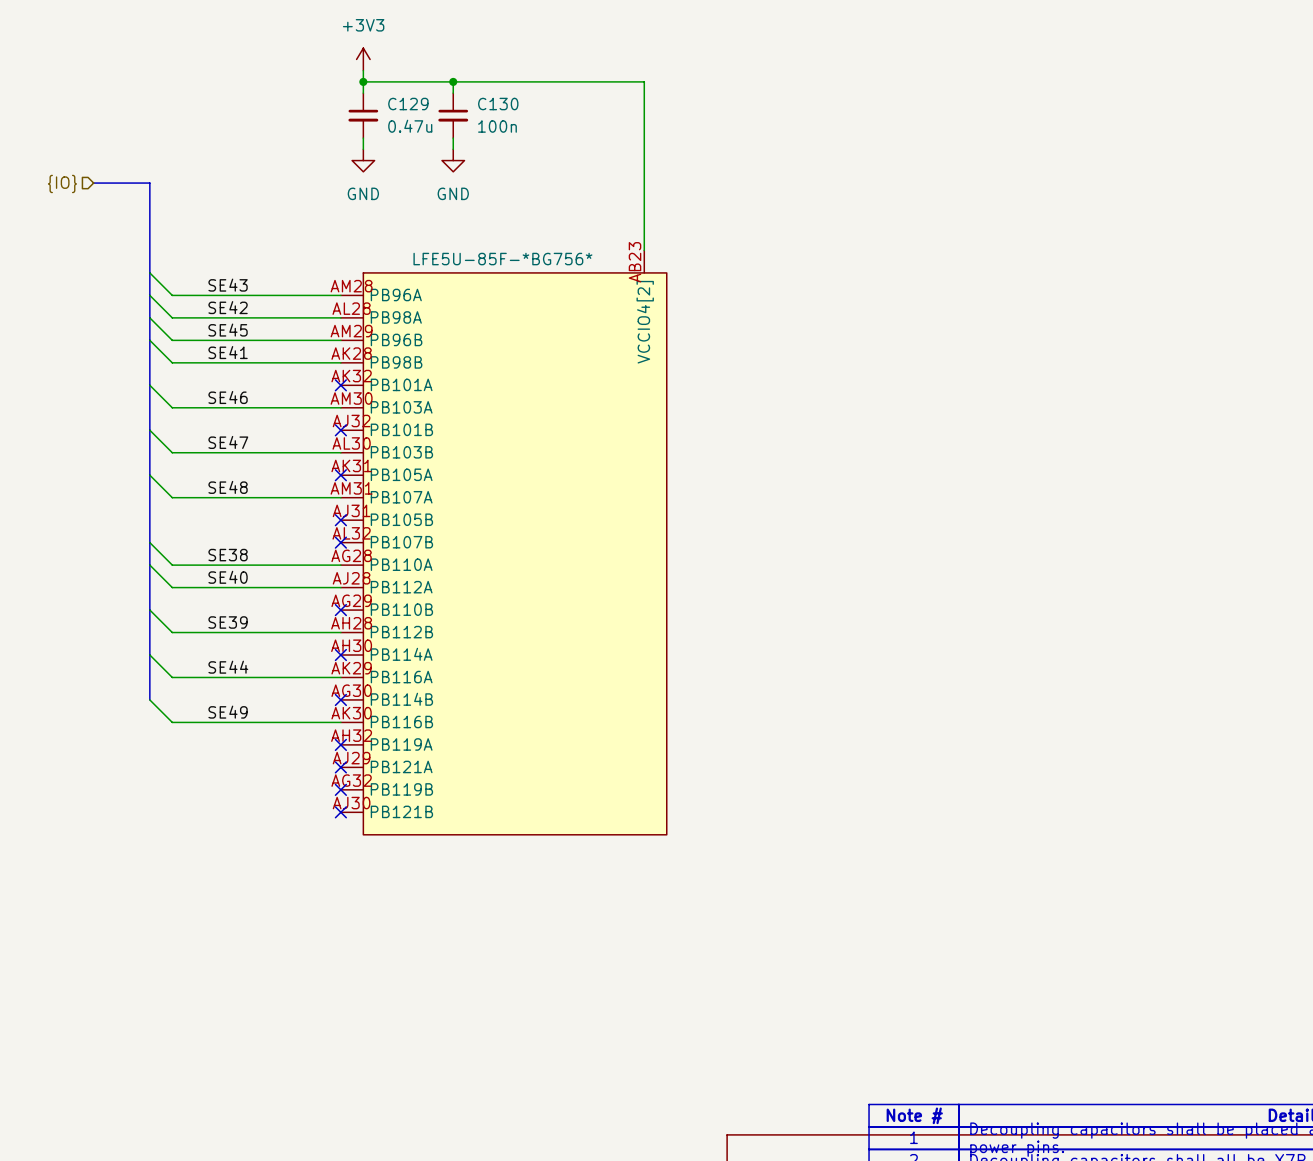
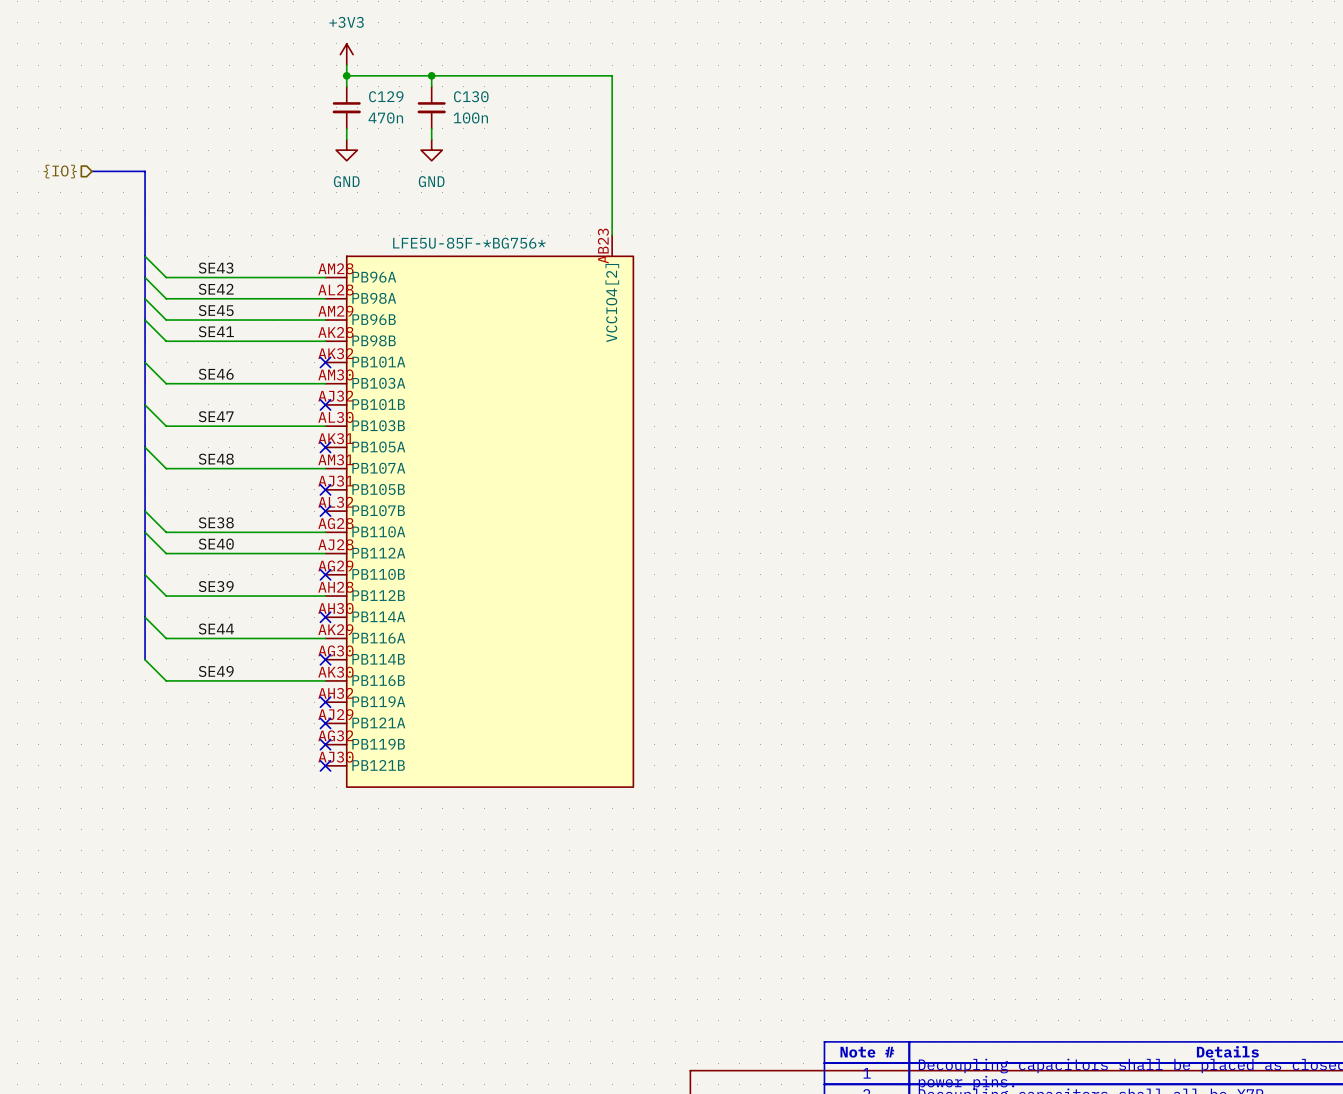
C129 value: 0.47u (410, 126) -> 470n (385, 117)

